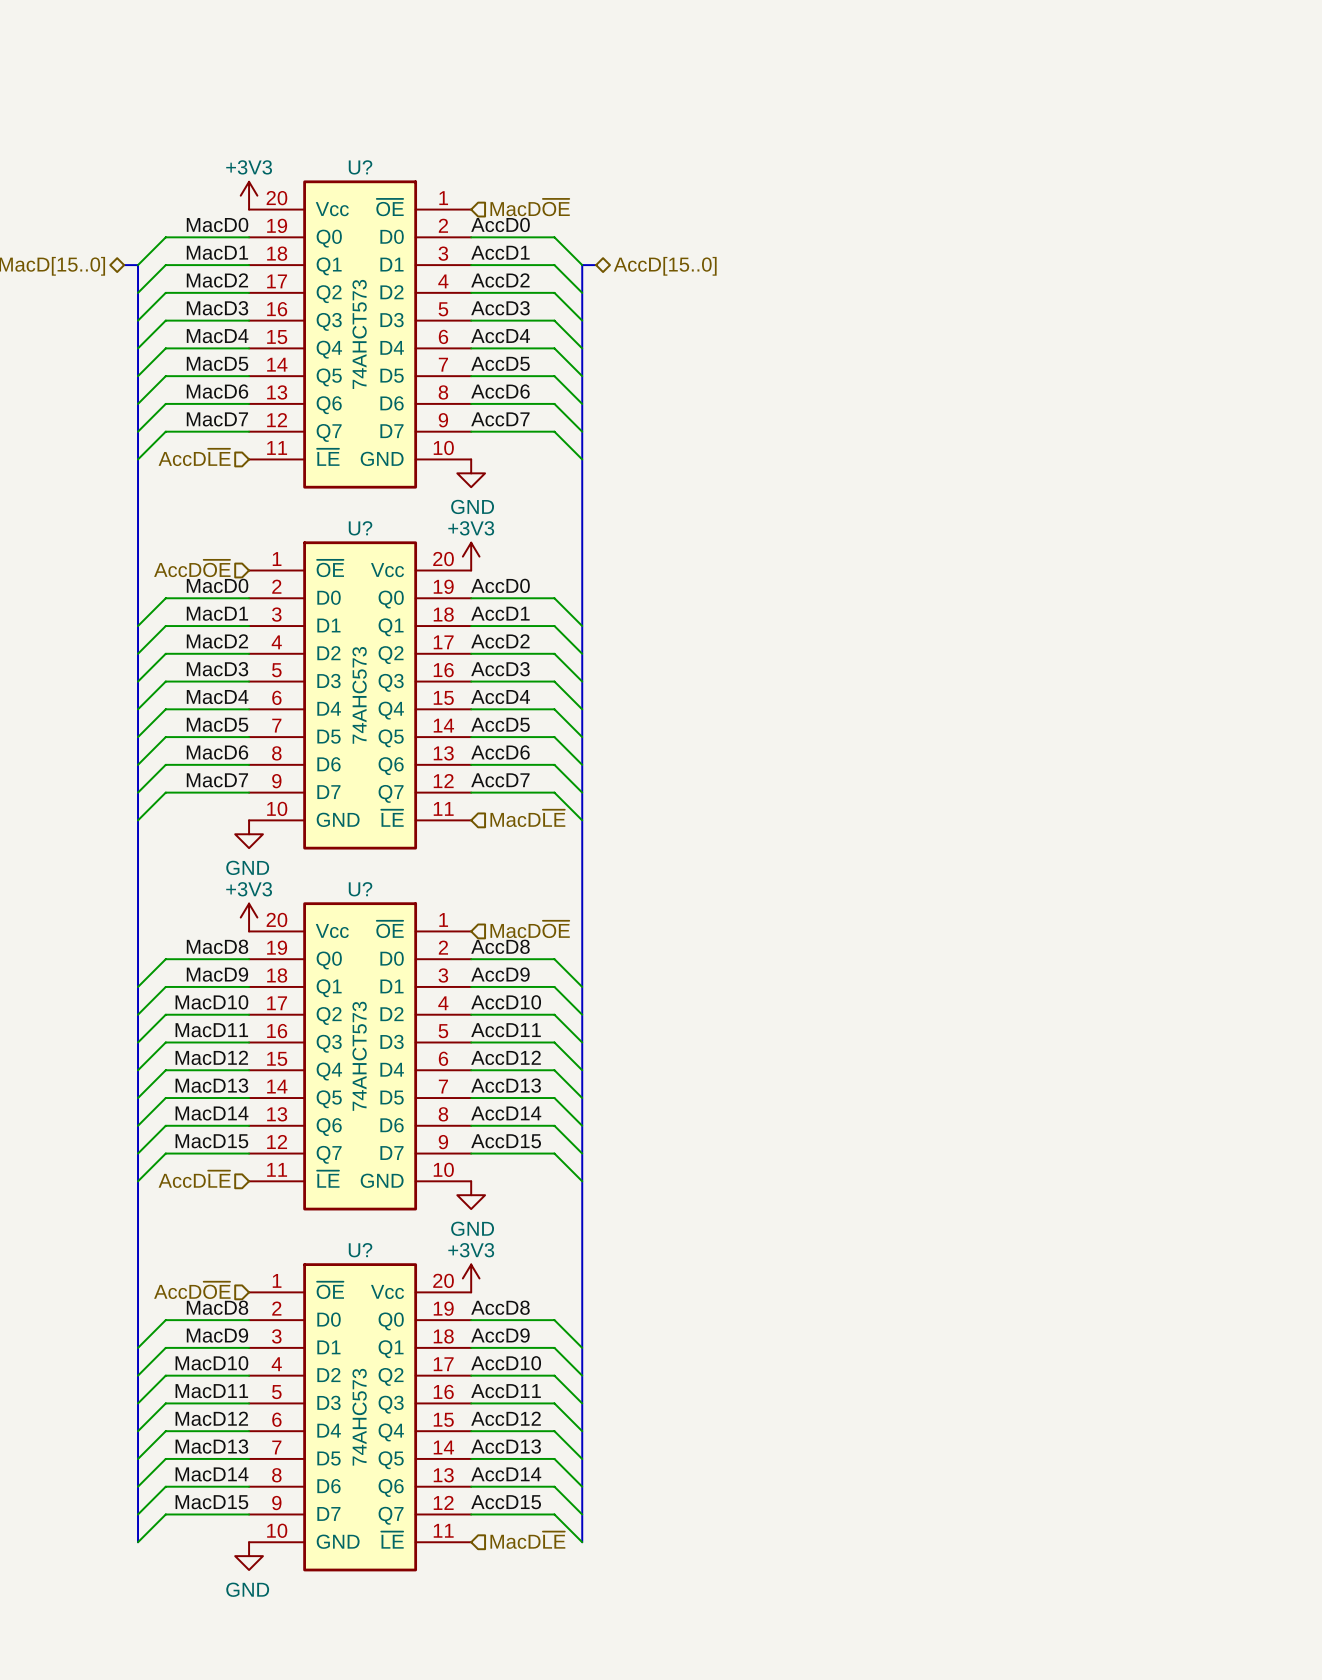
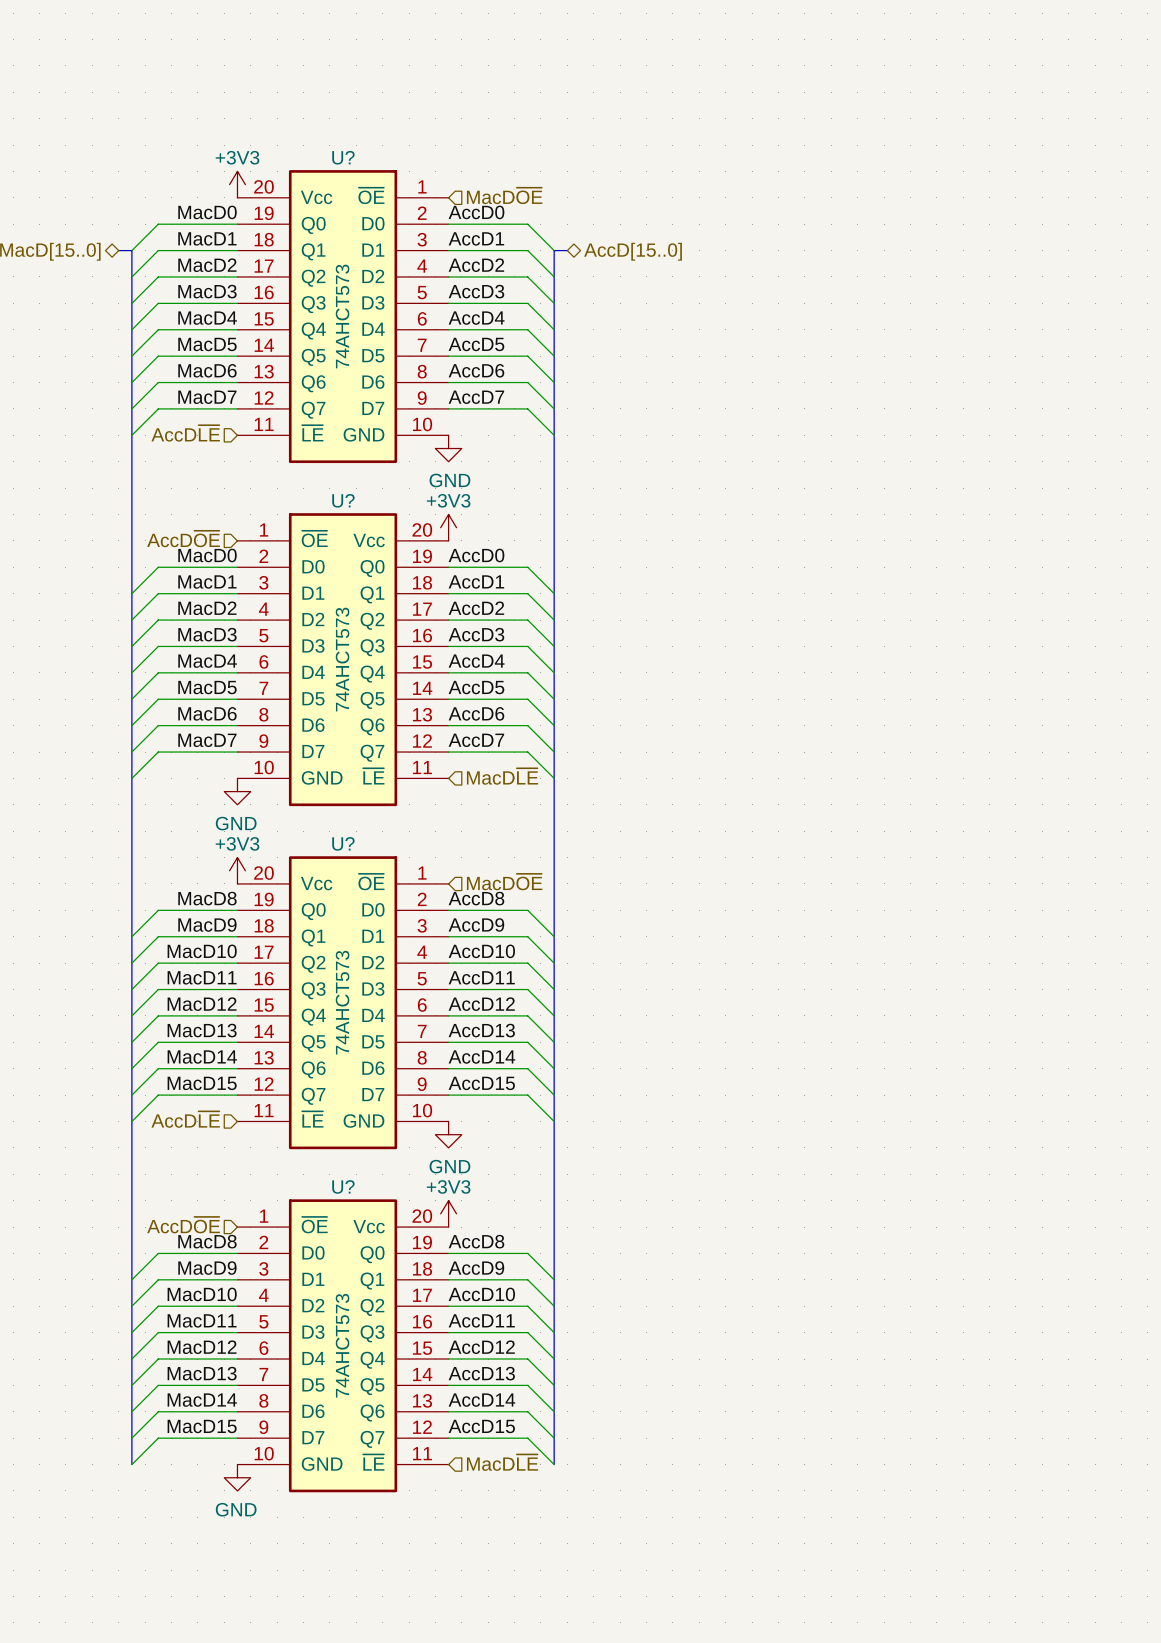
U? value: 74AHC573 (359, 695) -> 74AHCT573 (342, 659)
U? value: 74AHC573 (359, 1417) -> 74AHCT573 (342, 1345)

